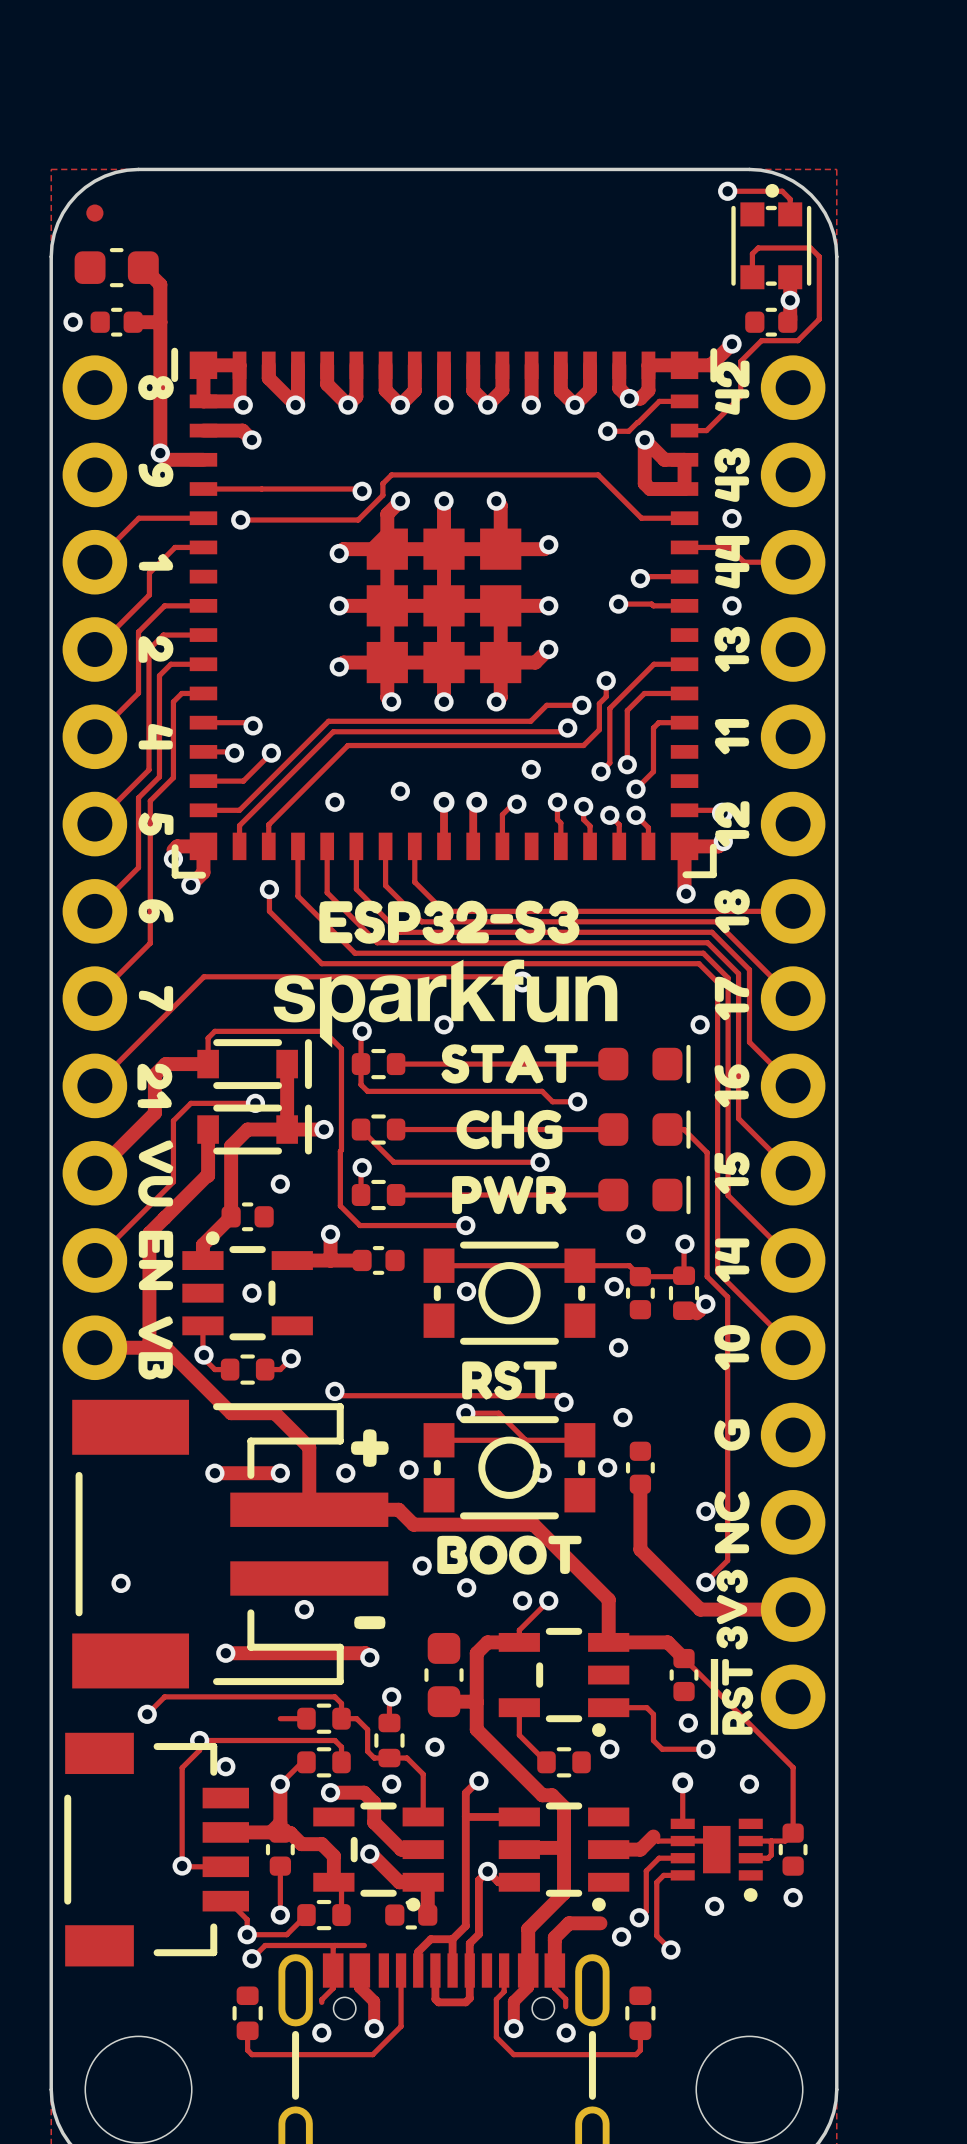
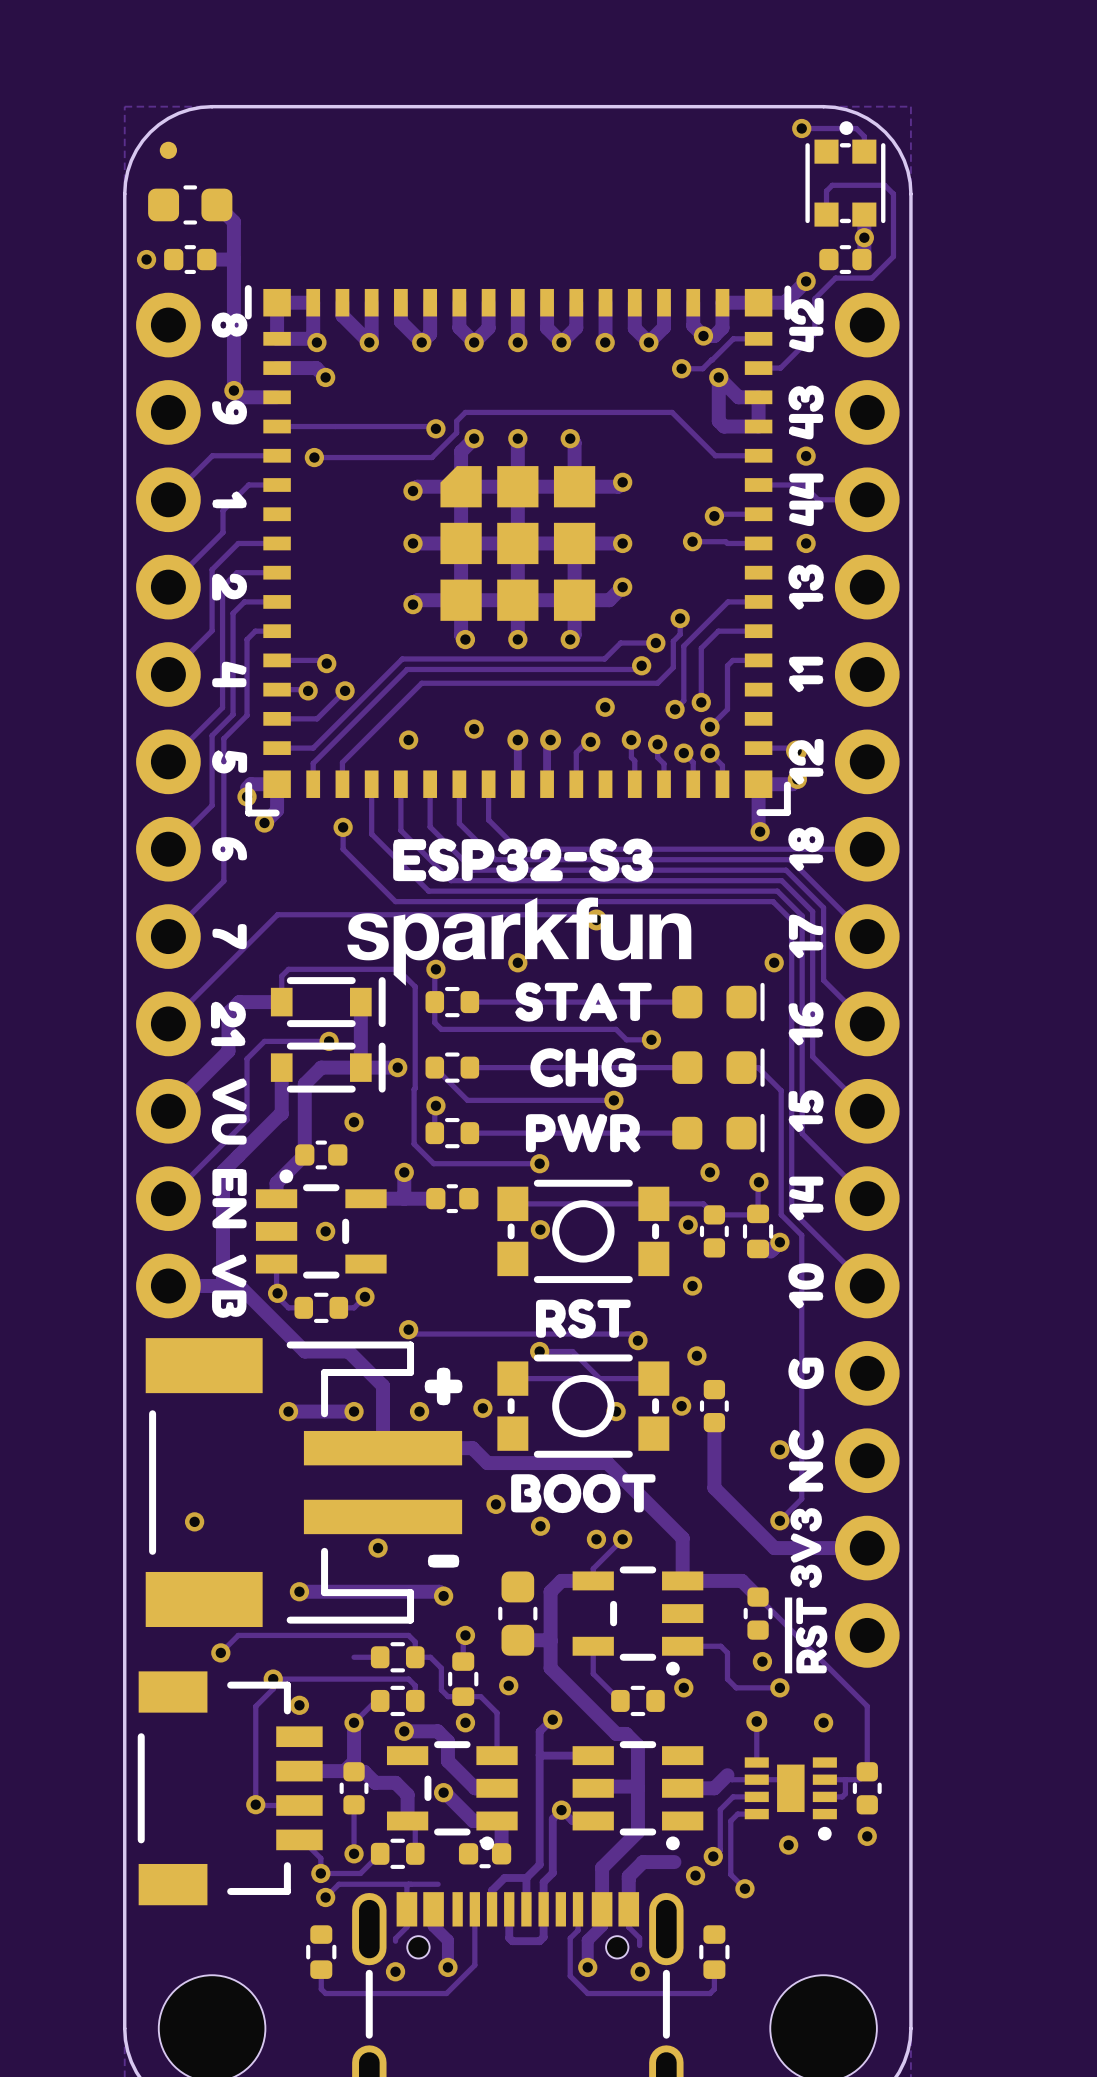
part footprint: [72, 1399, 389, 1689] -> [145, 1338, 463, 1628]

